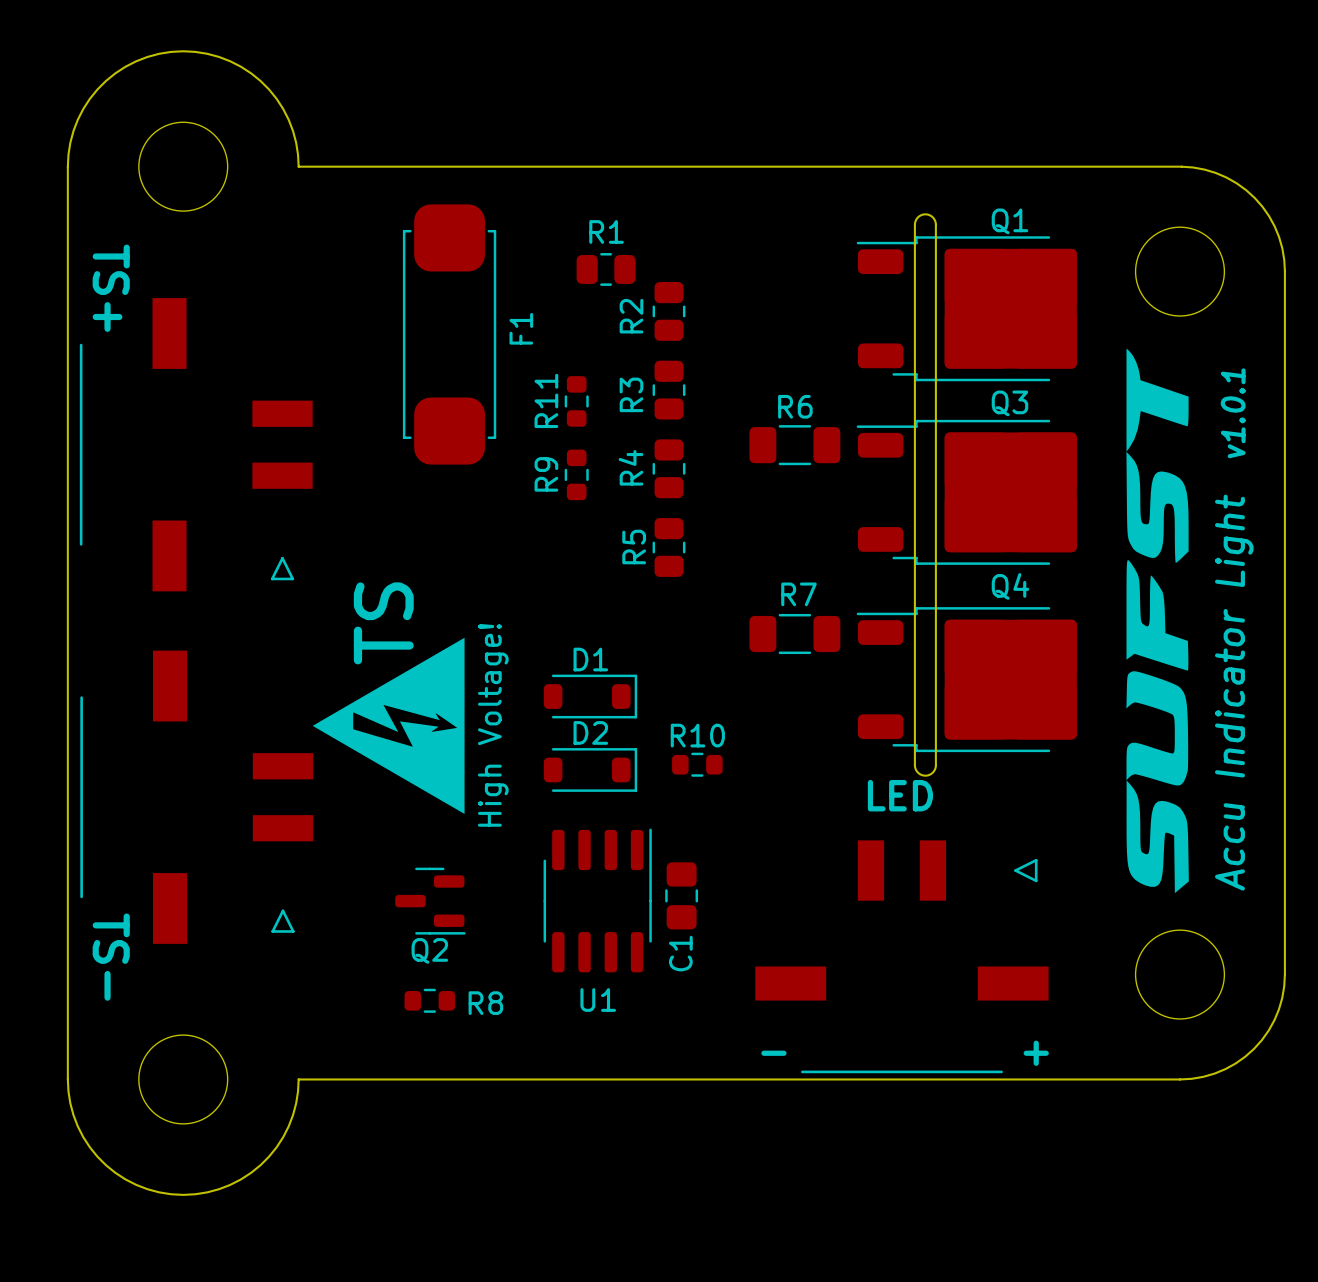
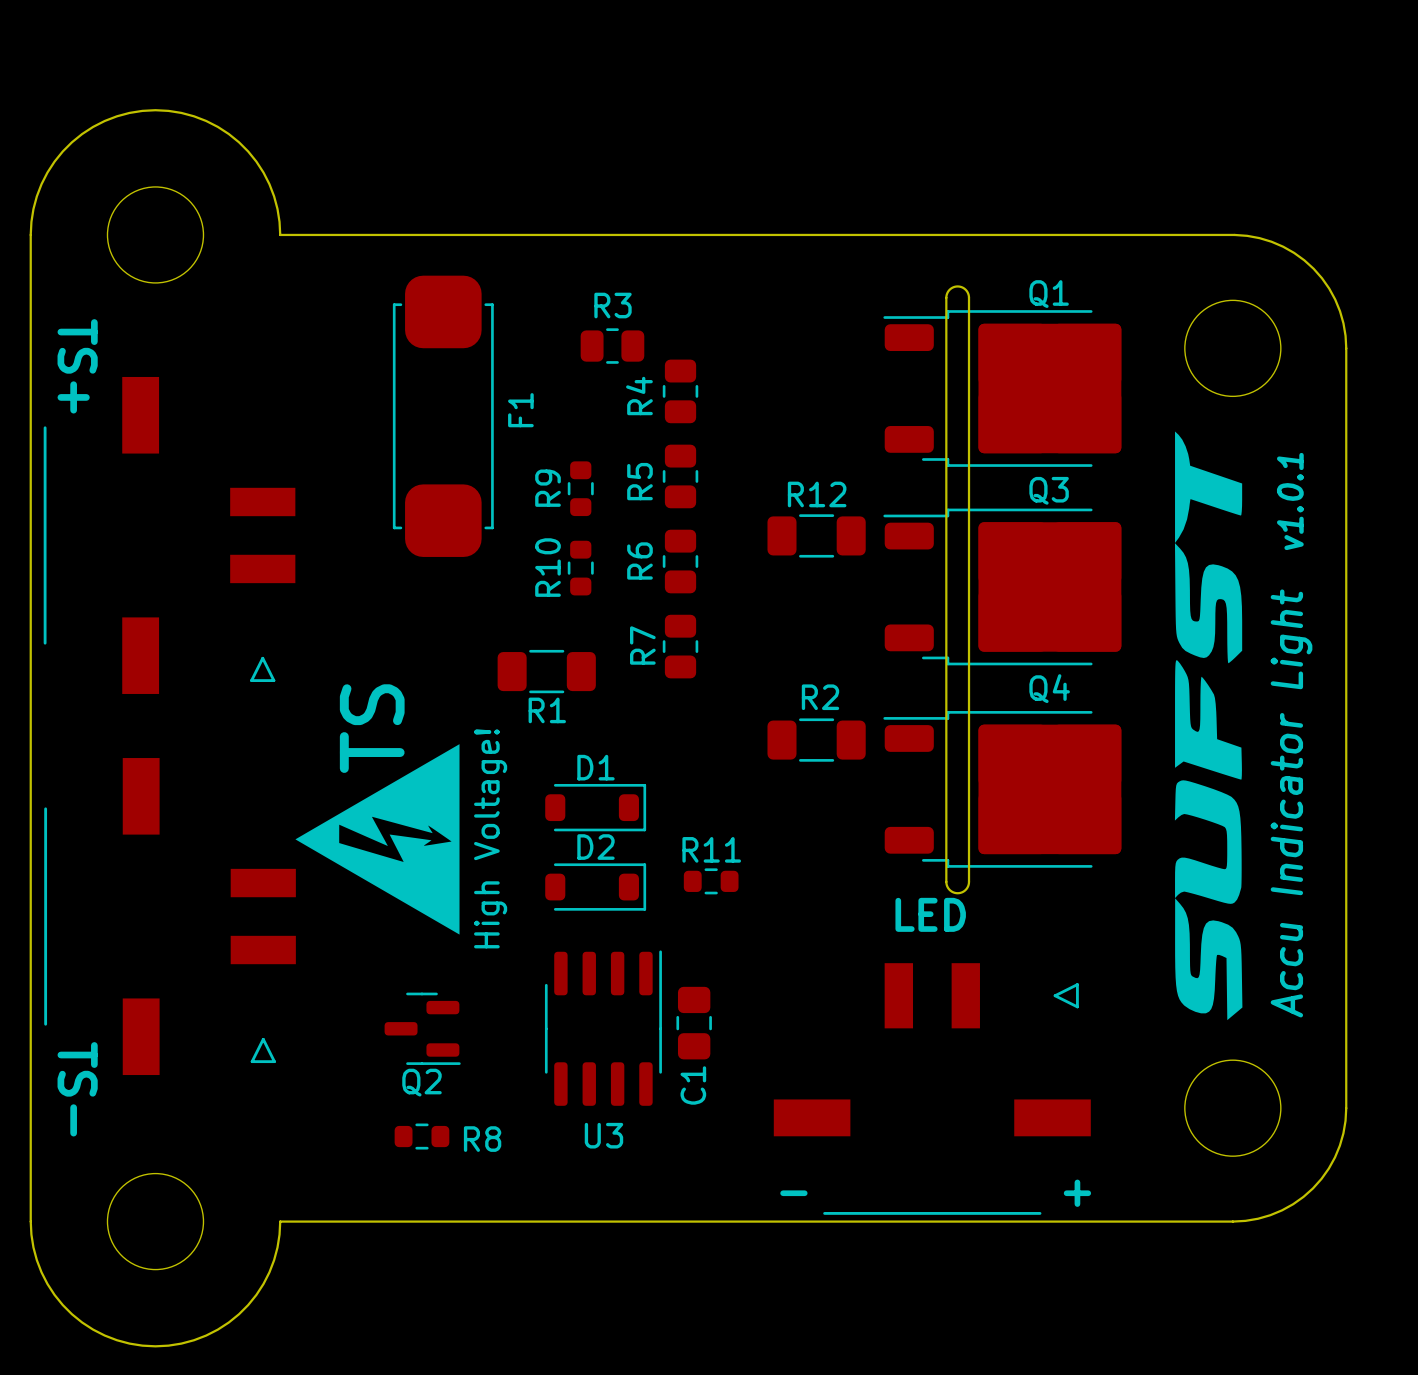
R1 name: R1 (606, 231) -> R3 (613, 305)
R2 name: R2 (631, 316) -> R4 (639, 396)
R3 name: R3 (631, 394) -> R5 (639, 481)
R11 name: R11 (546, 400) -> R9 (548, 488)
R6 name: R6 (795, 406) -> R12 (817, 494)
R4 name: R4 (631, 467) -> R6 (639, 560)
R9 name: R9 (546, 474) -> R10 (548, 567)
R5 name: R5 (634, 547) -> R7 (642, 645)
R1: none -> (546, 671)
R7 name: R7 (798, 594) -> R2 (820, 697)
R10 name: R10 (697, 735) -> R11 (711, 849)
U1 name: U1 (598, 1000) -> U3 (603, 1135)

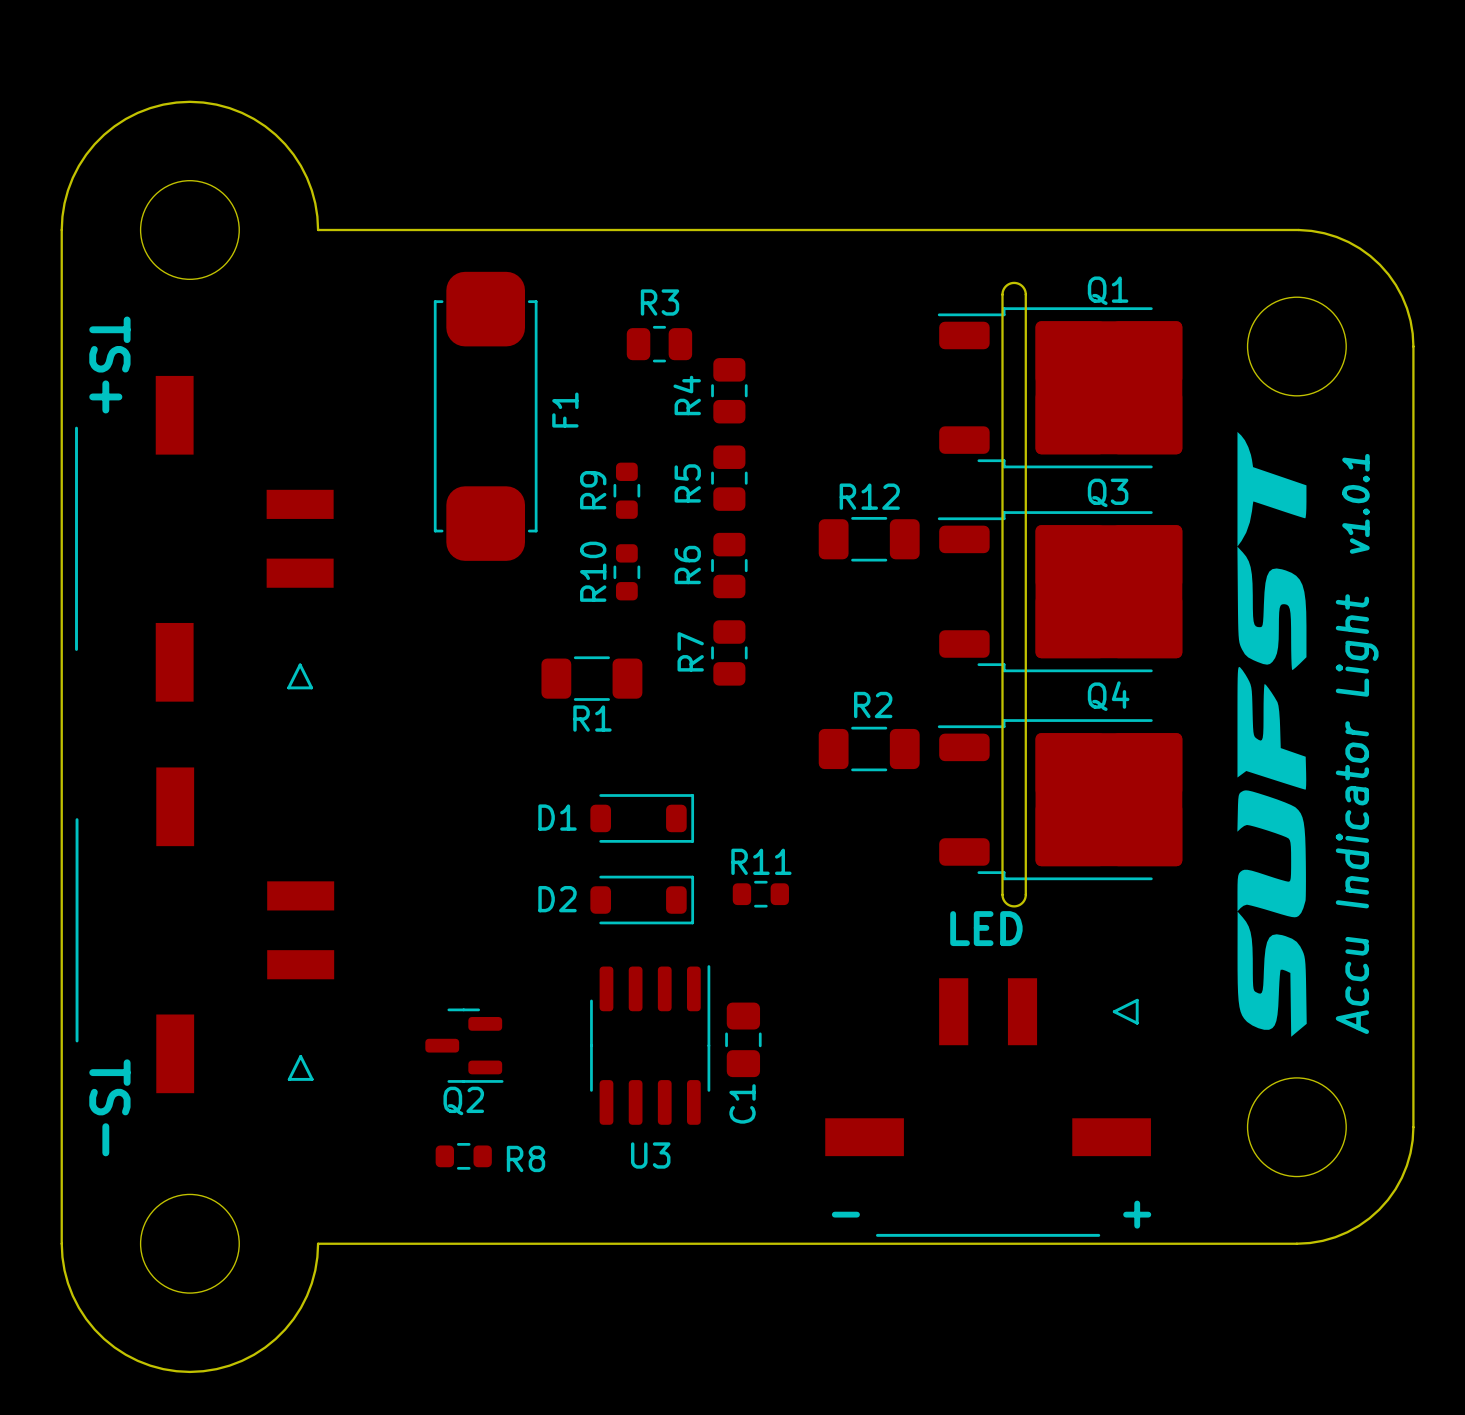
text: TS (372, 728) -> none
drawing: [295, 744, 460, 935] -> none
D1 name position: D1 (595, 767) -> D1 (557, 817)
text: High Voltage! (490, 838) -> none
D2 name position: D2 (595, 847) -> D2 (557, 899)

